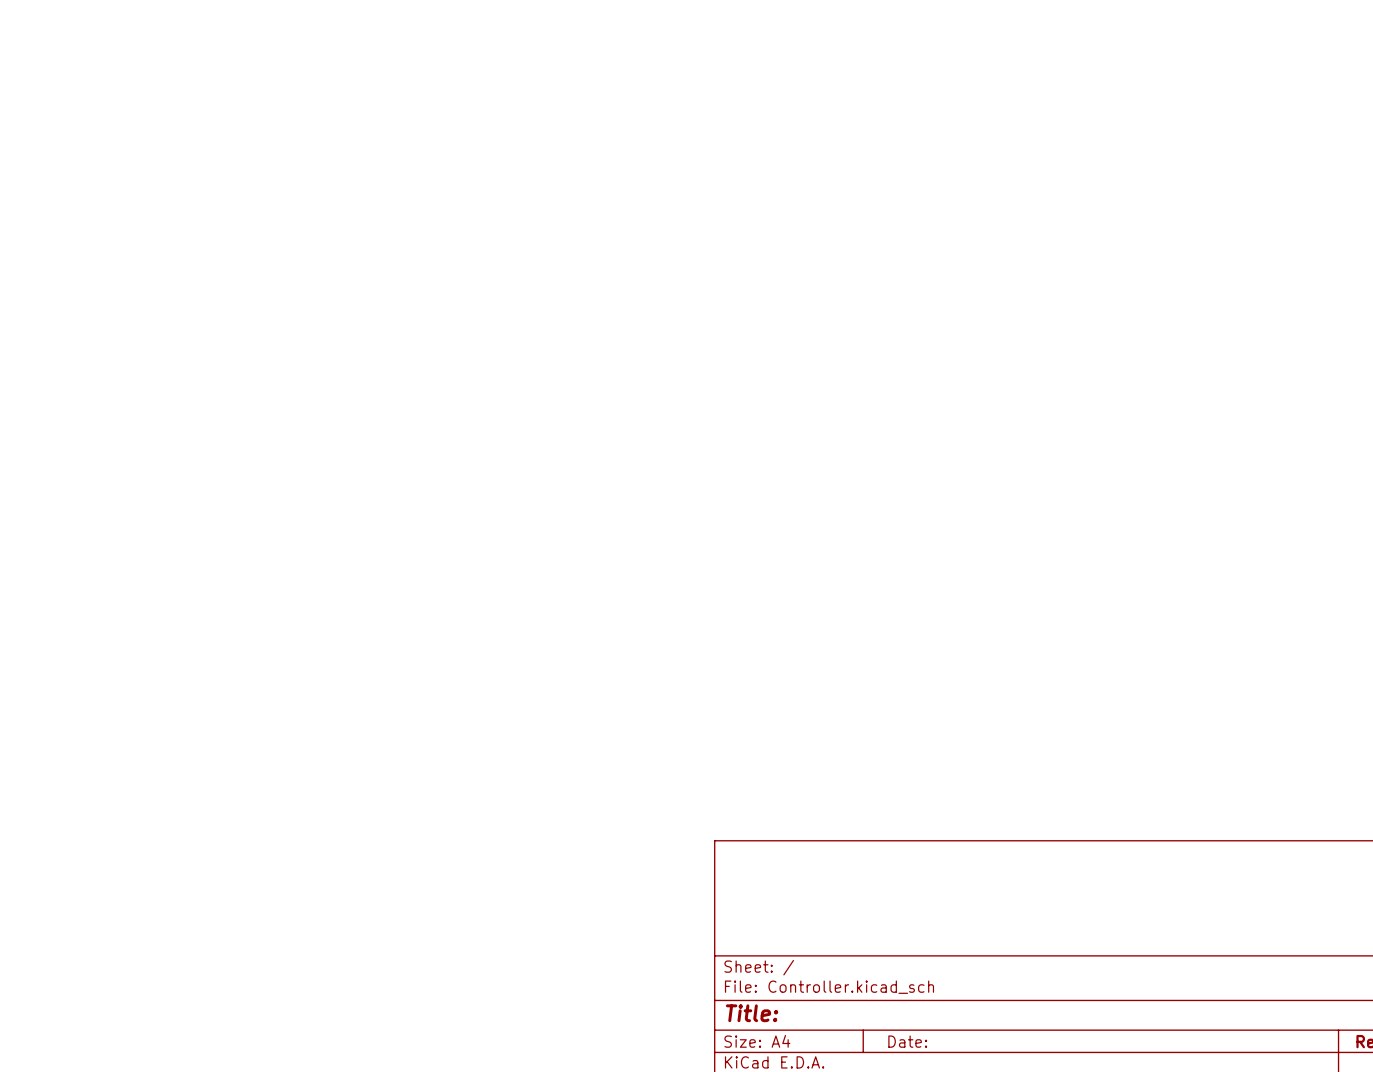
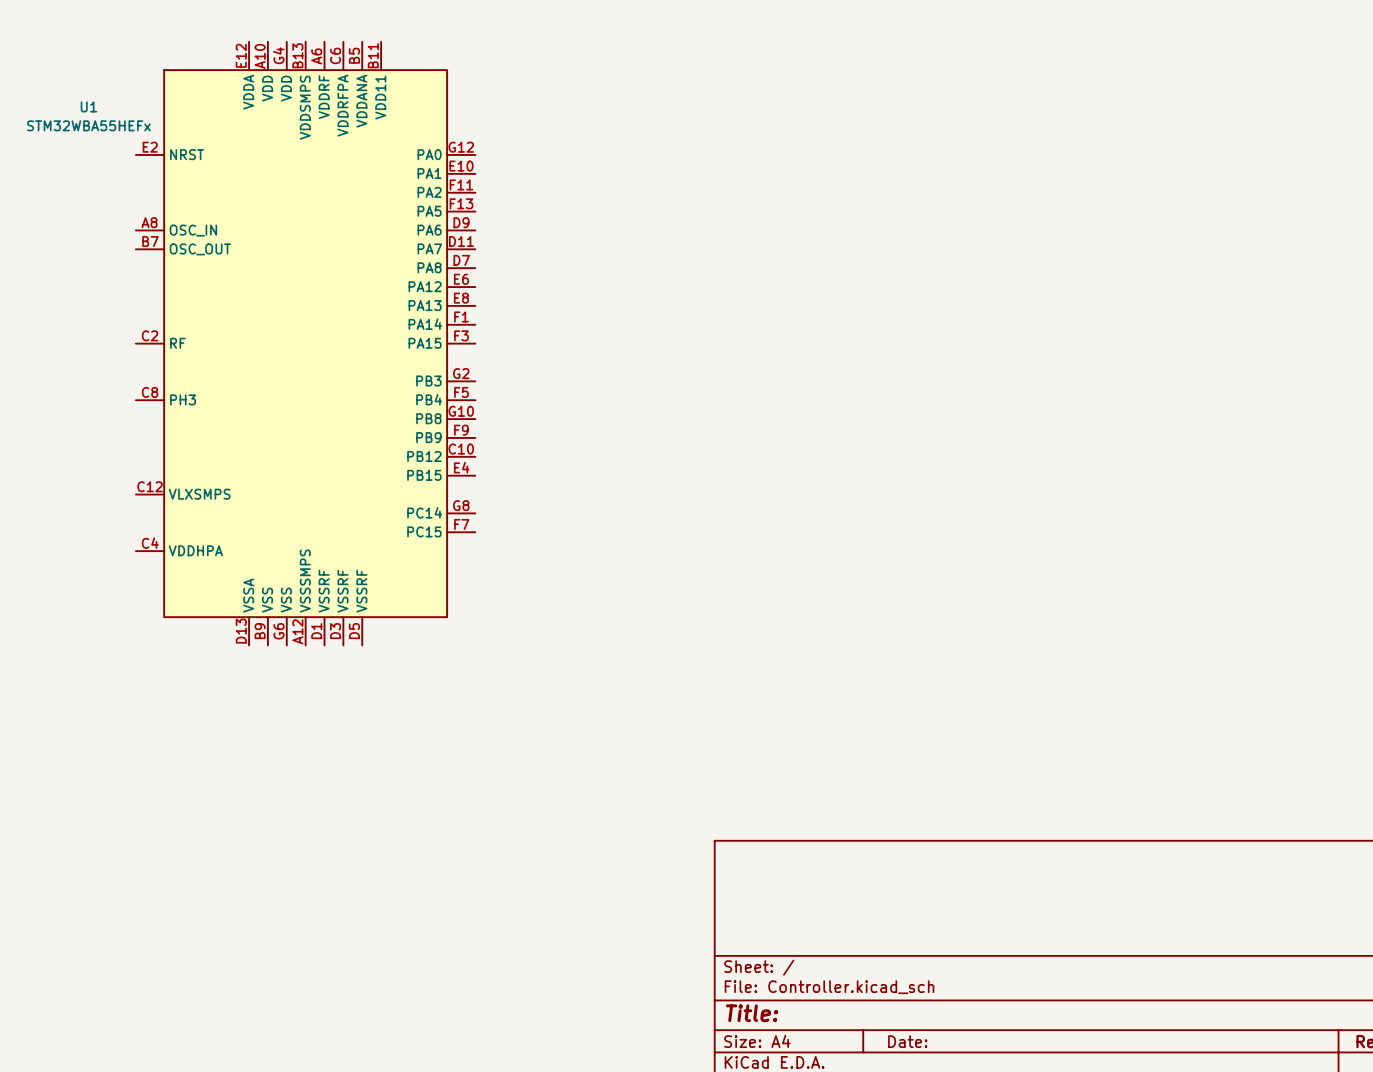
U1: none -> STM32WBA55HEFx (305, 343)

